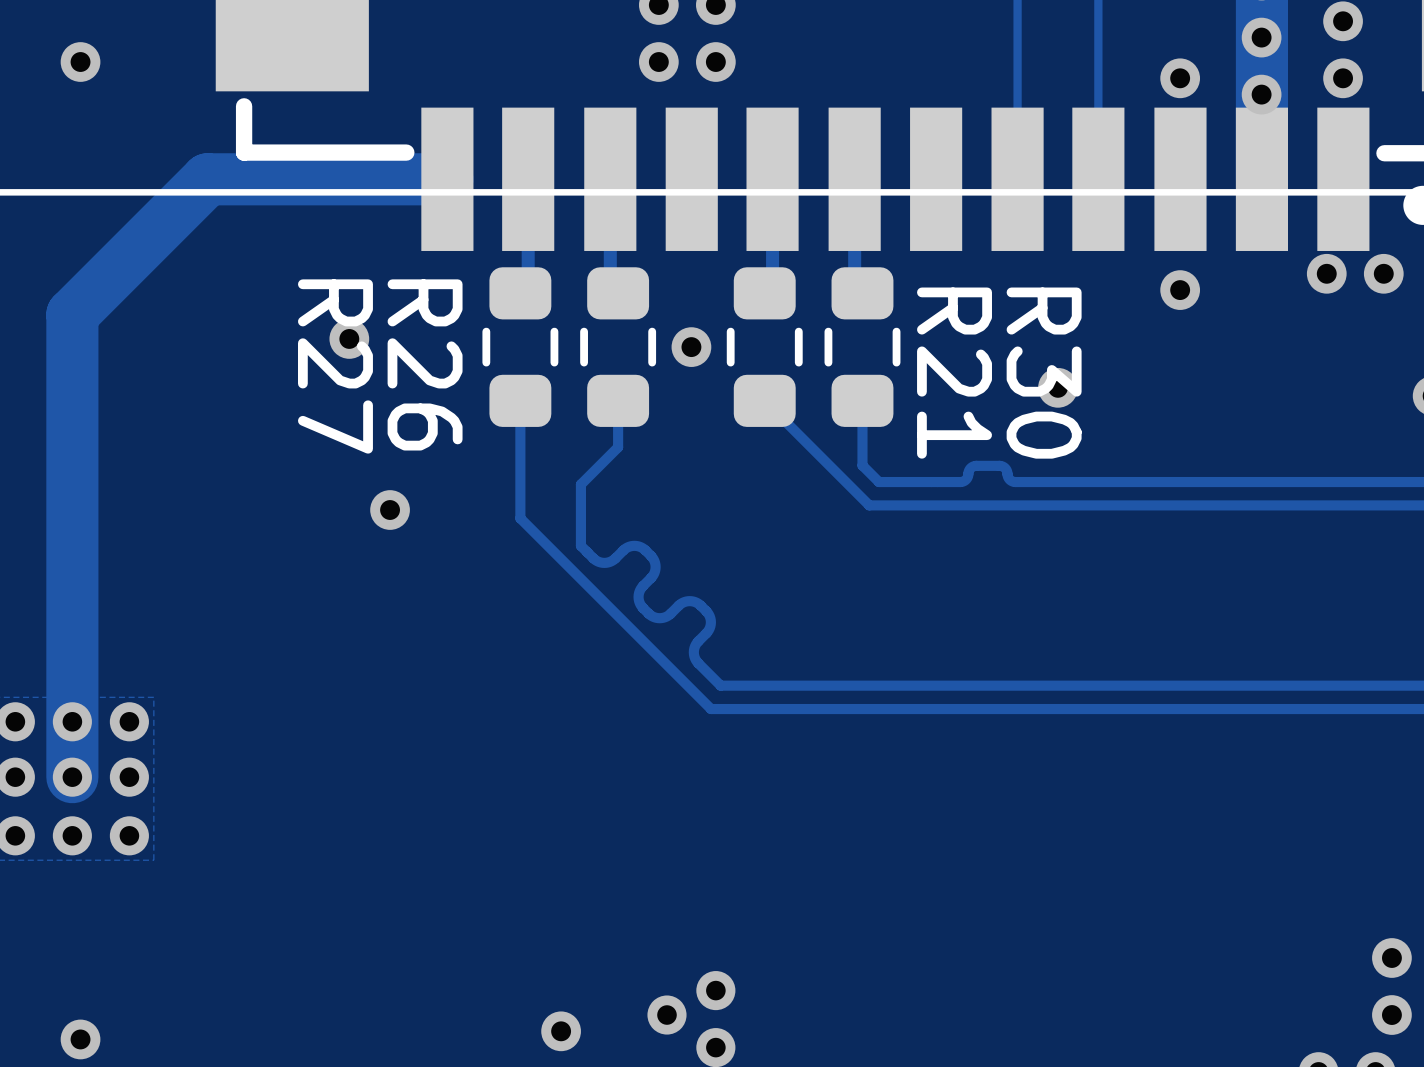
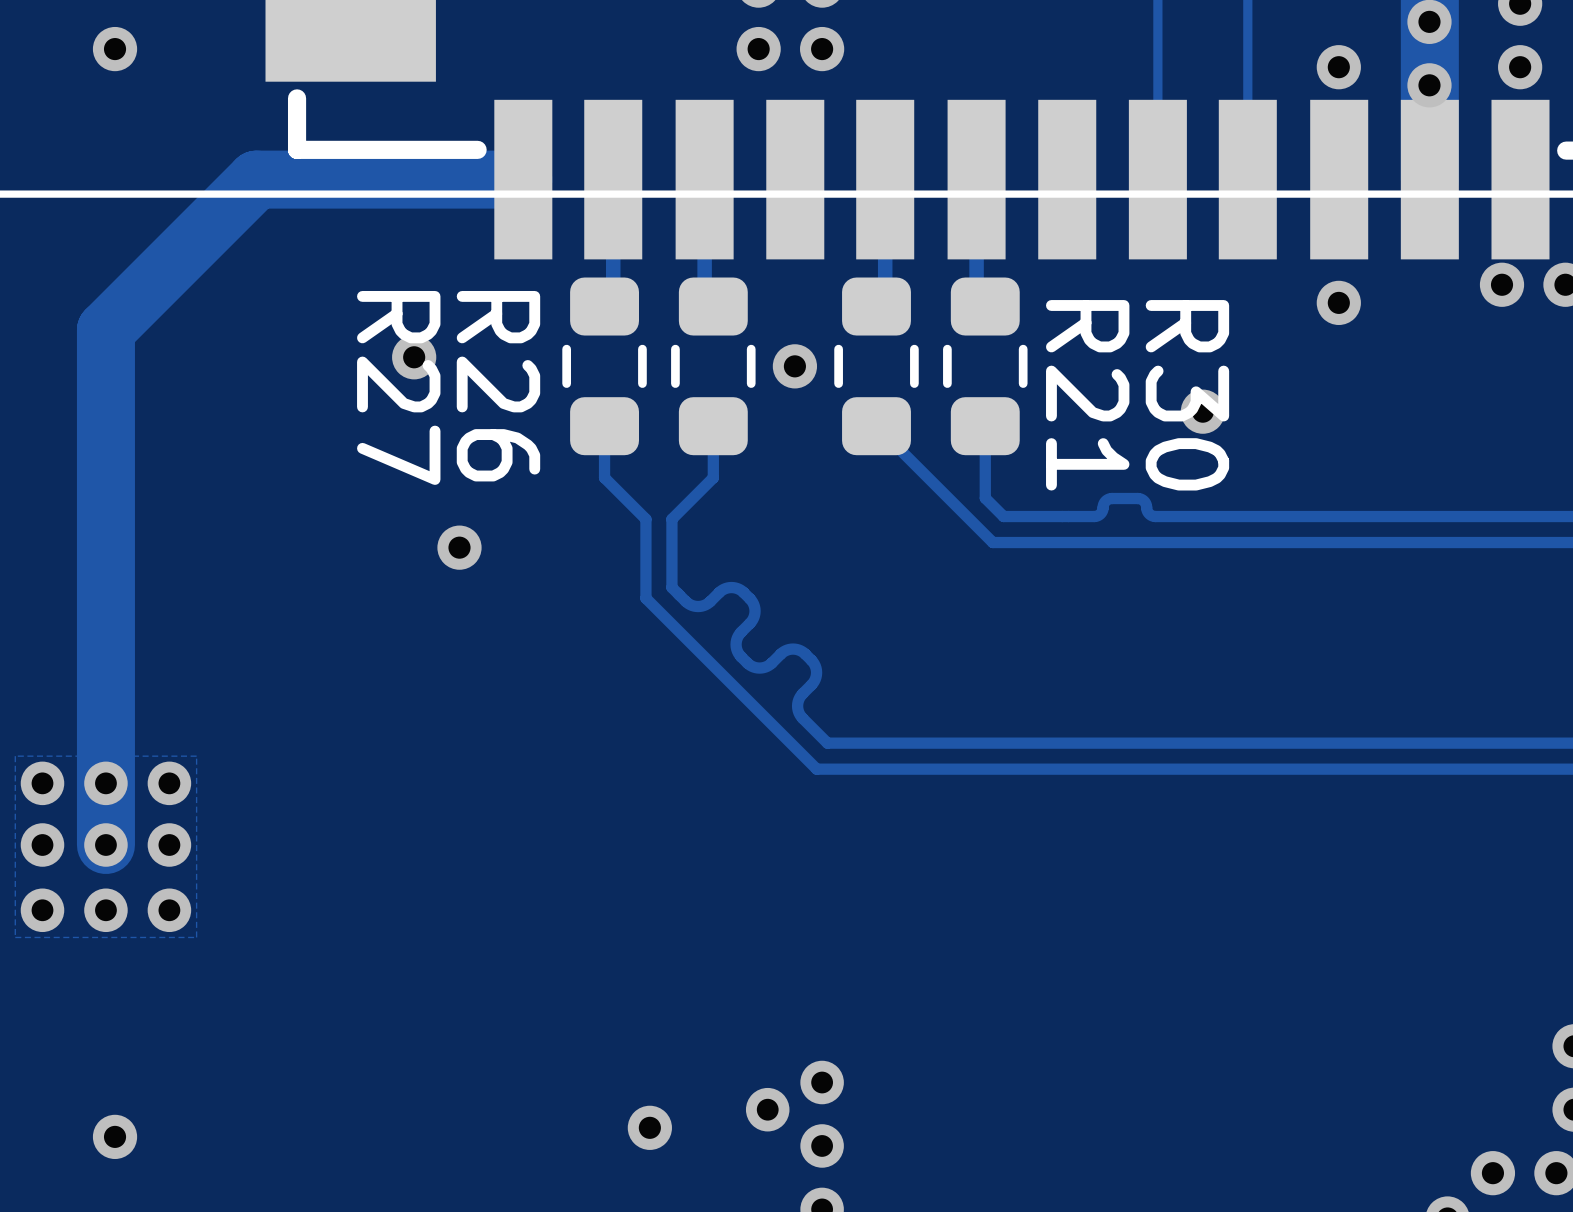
track: (520, 447) (520, 518) (557, 555) -> (604, 477) (645, 519) (645, 598)

